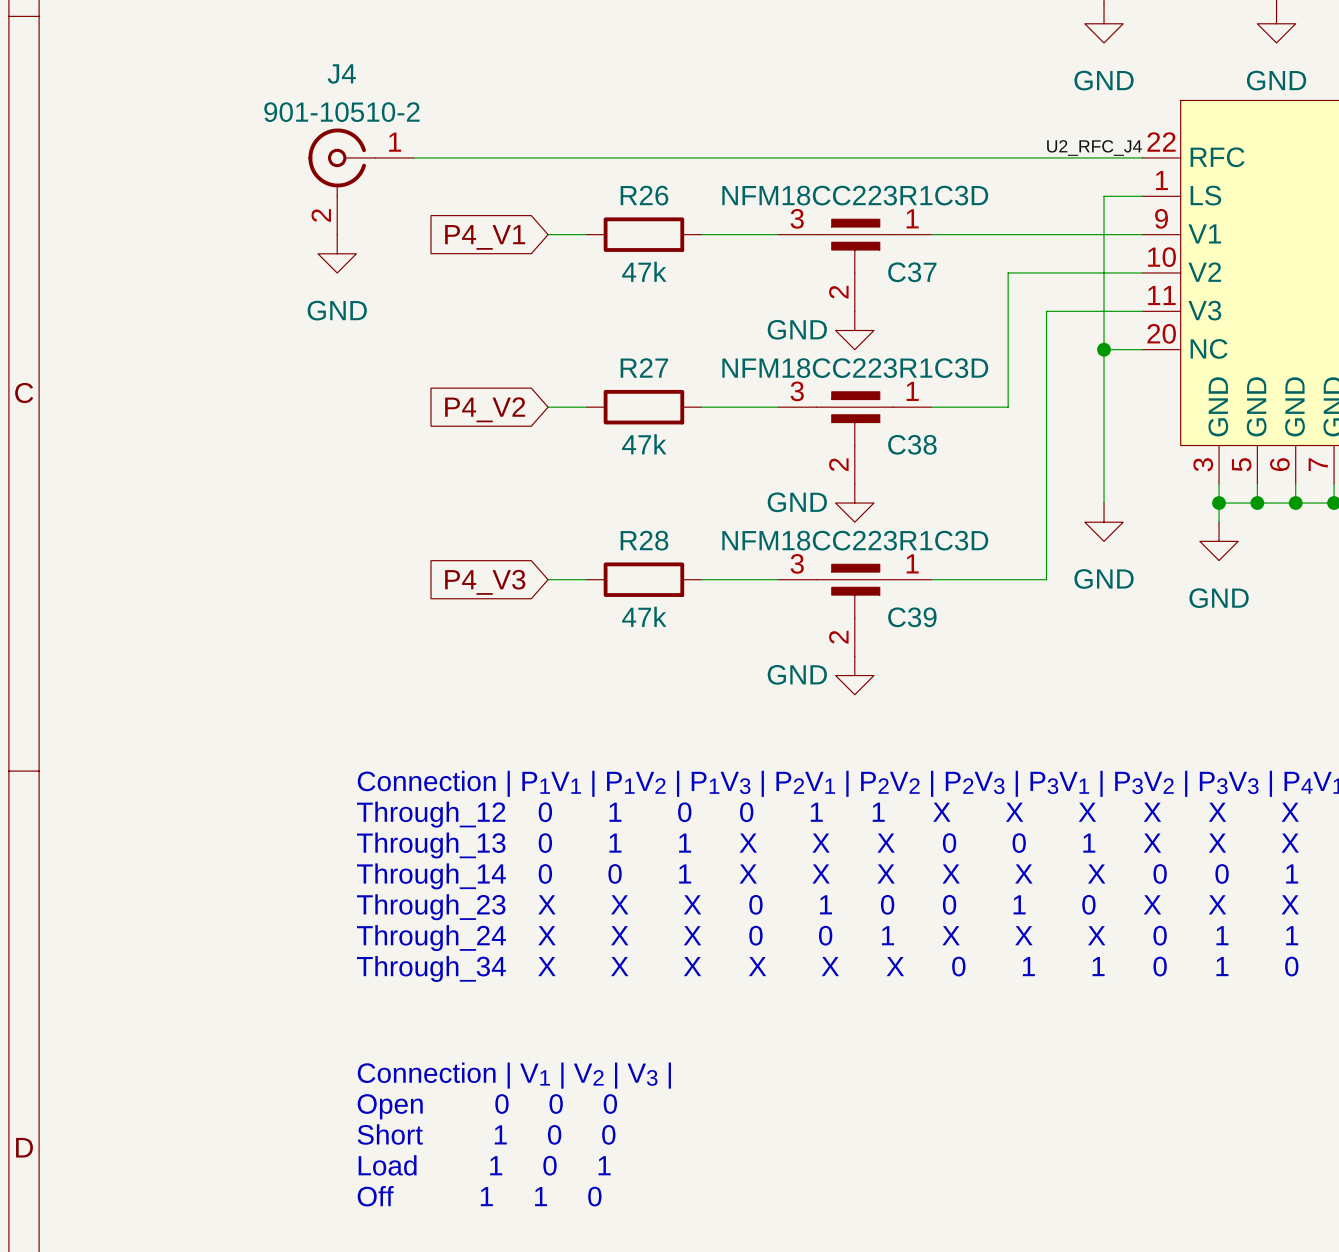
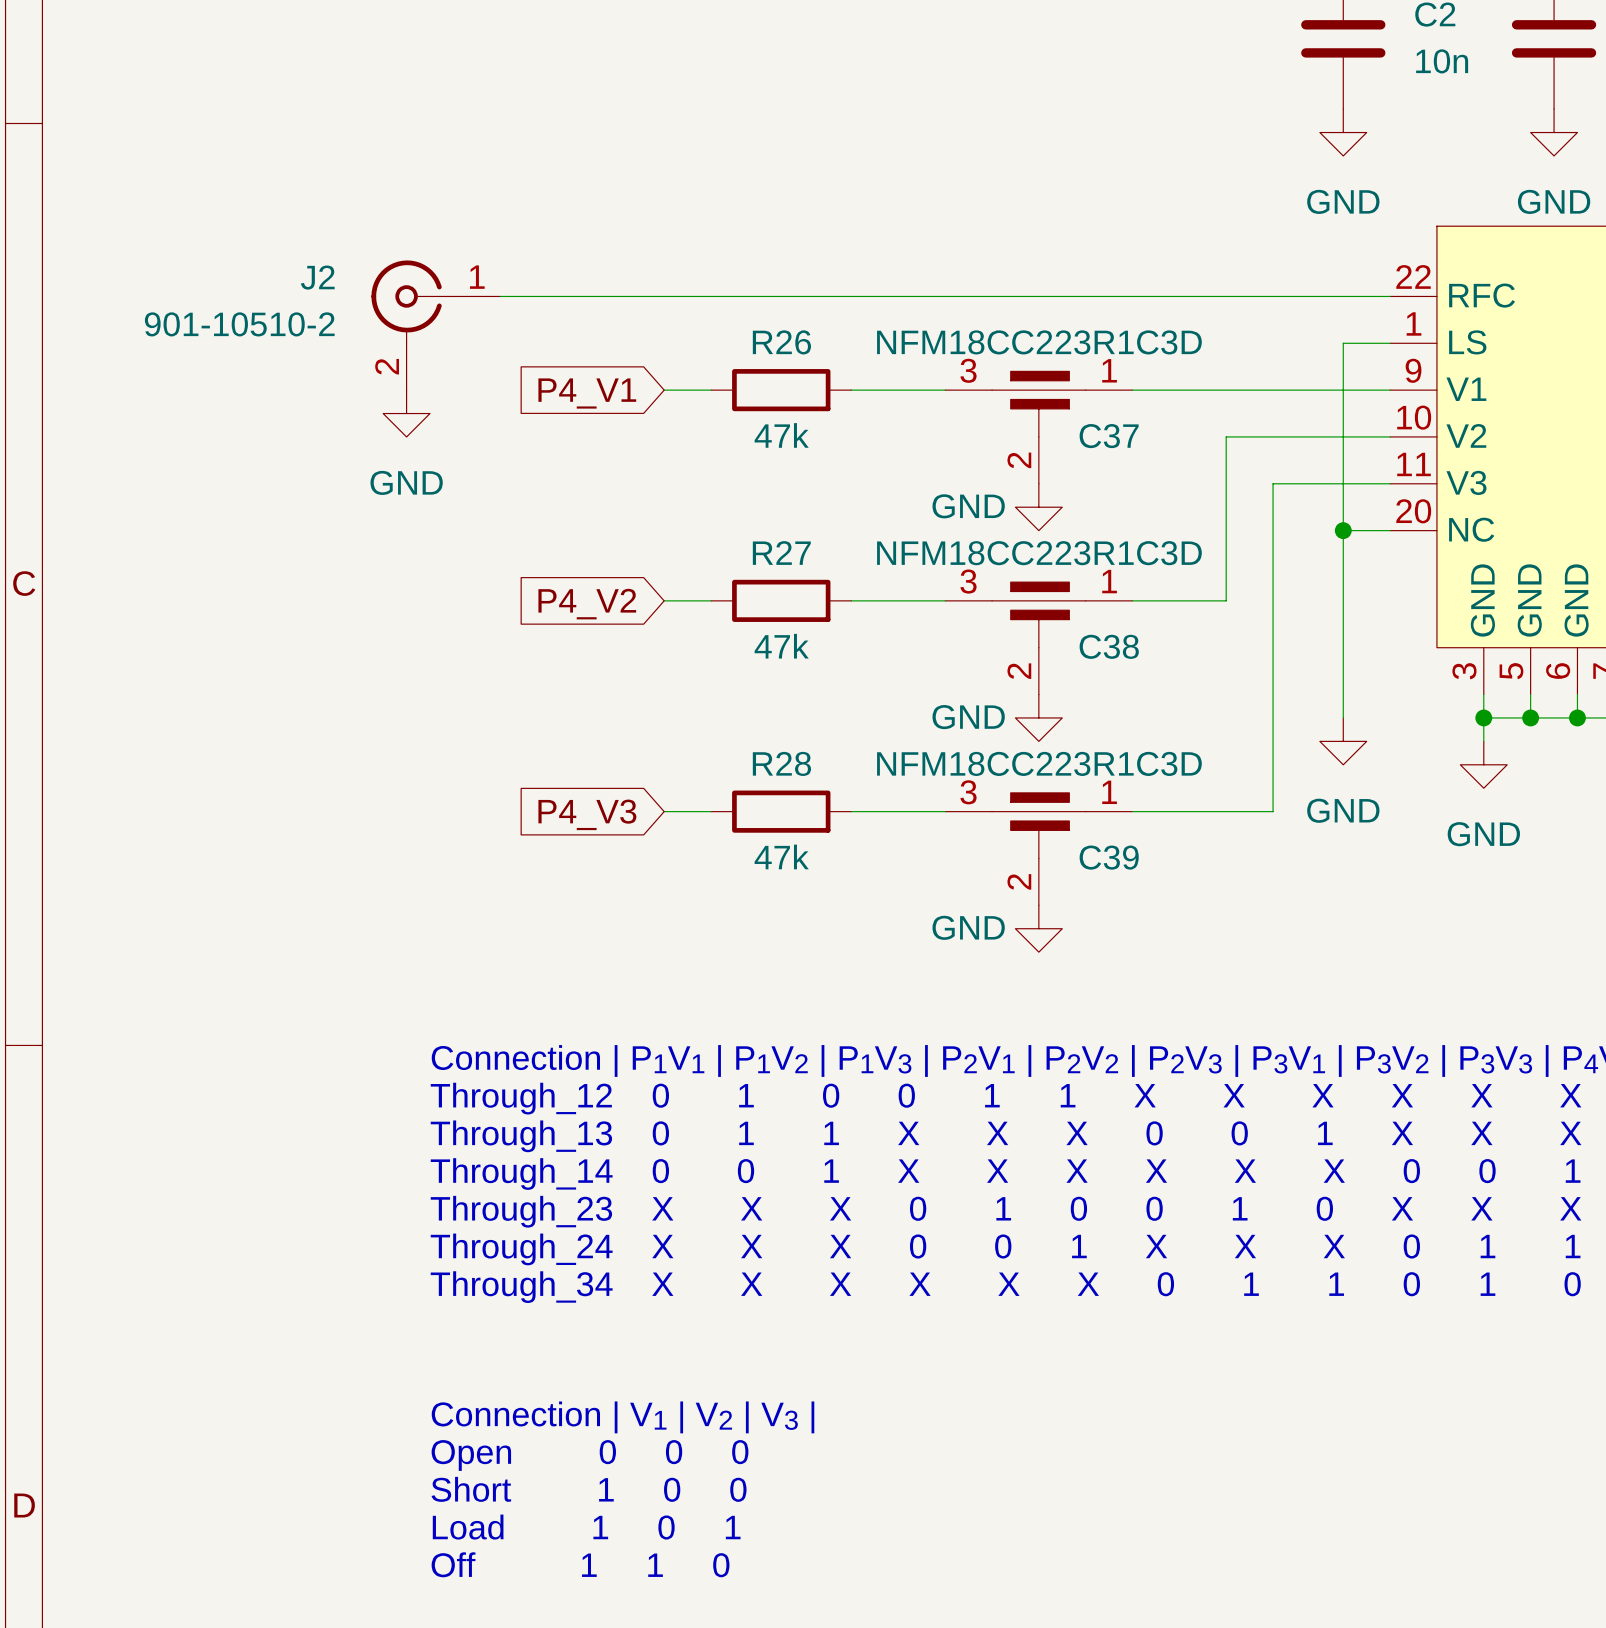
J4 name: J4 (341, 73) -> J2 (317, 277)
J4 value position: 901-10510-2 (341, 112) -> 901-10510-2 (239, 324)
label: U2_RFC_J4 (1094, 148) -> none

